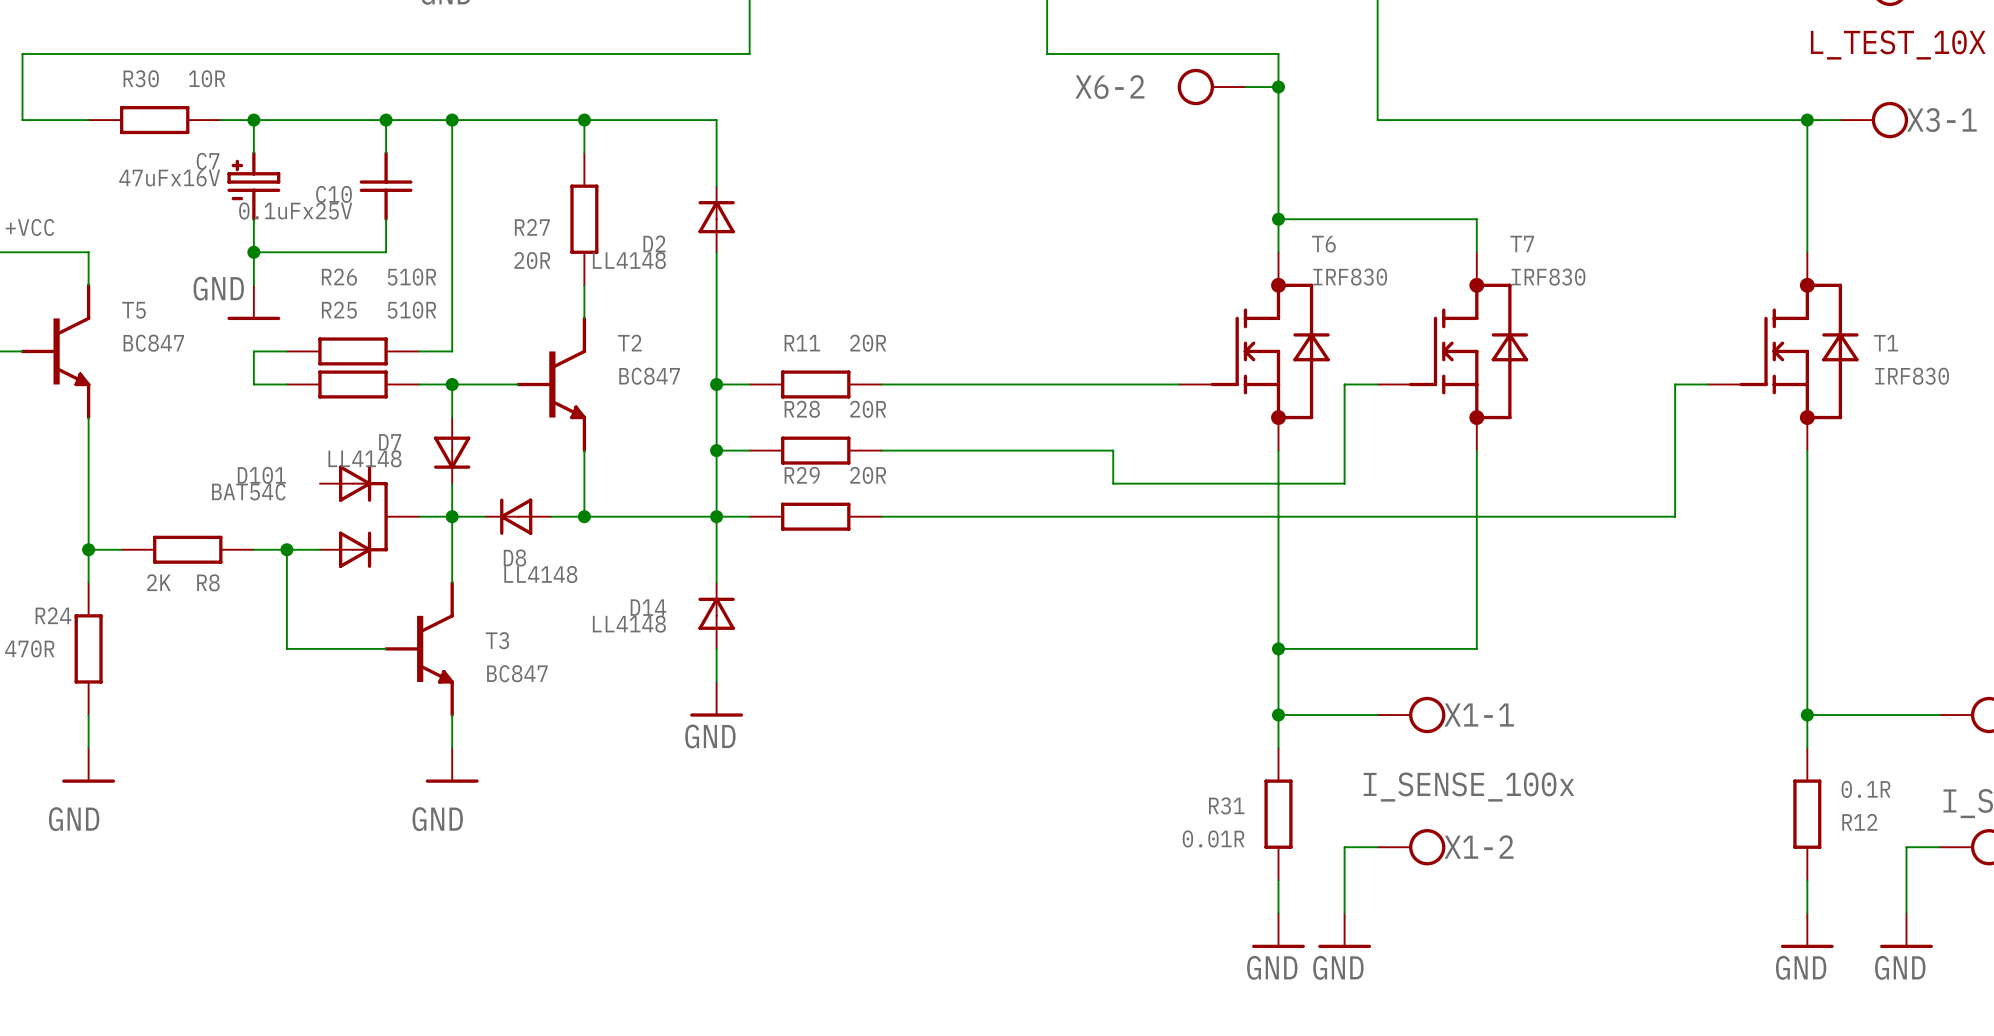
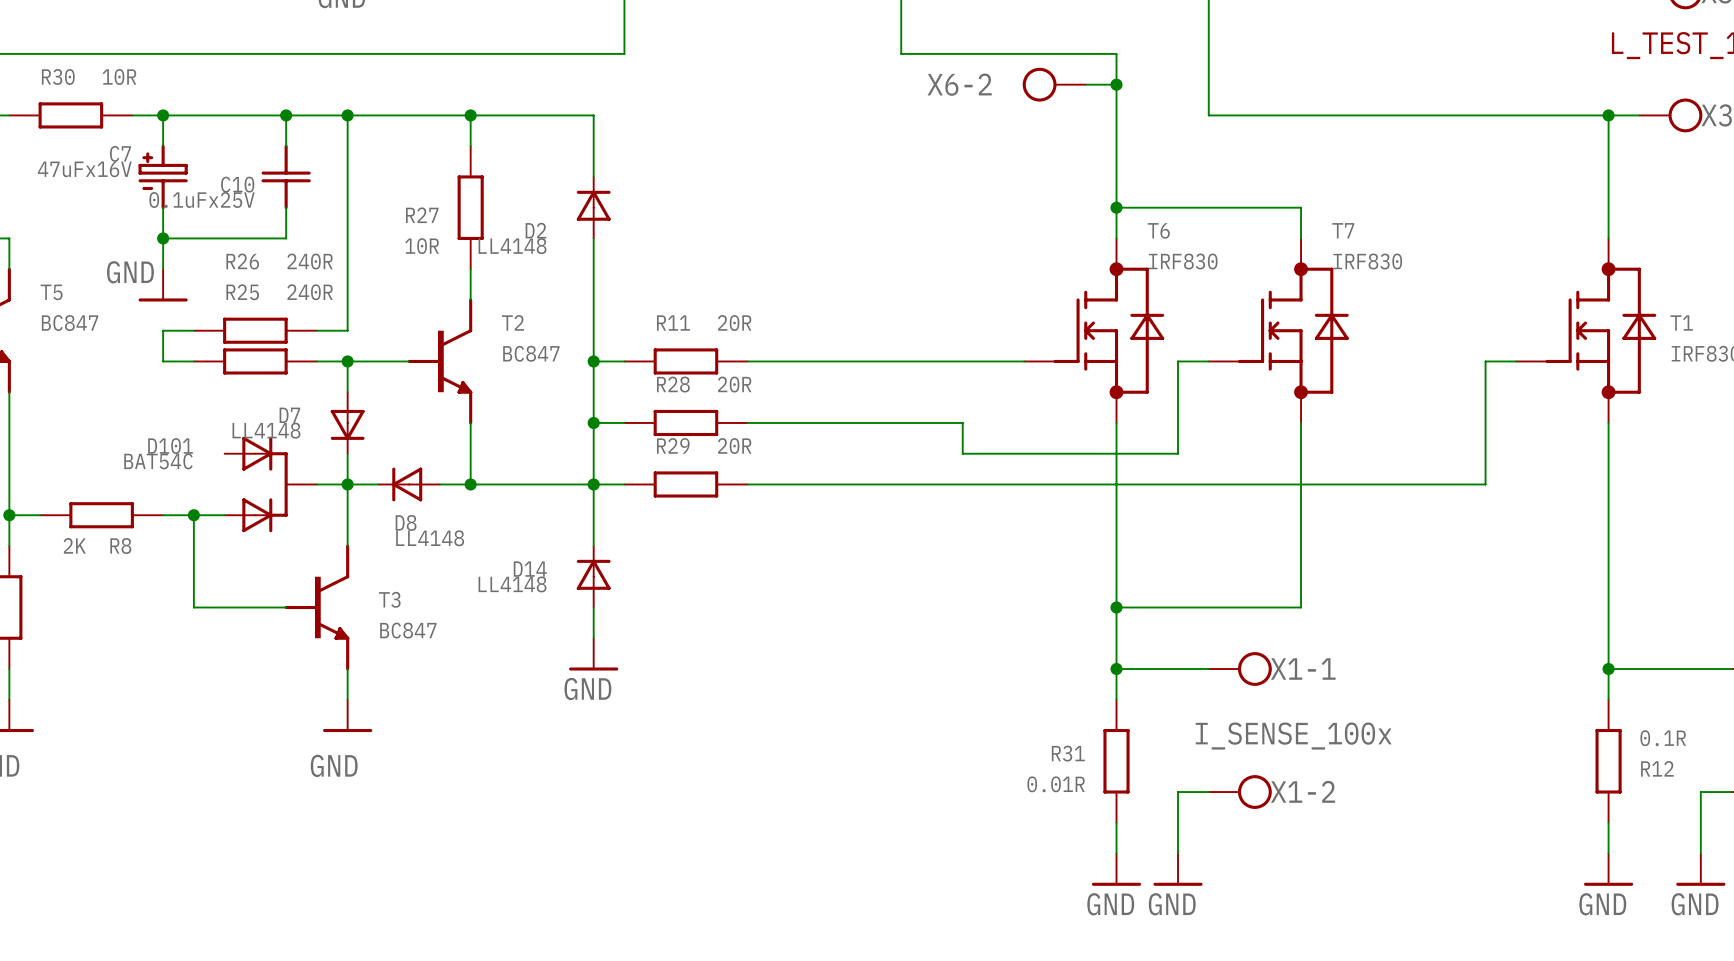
R27 value: 20R (532, 260) -> 10R (422, 246)
R26 value: 510R (411, 277) -> 240R (310, 261)
R25 value: 510R (411, 310) -> 240R (310, 292)

